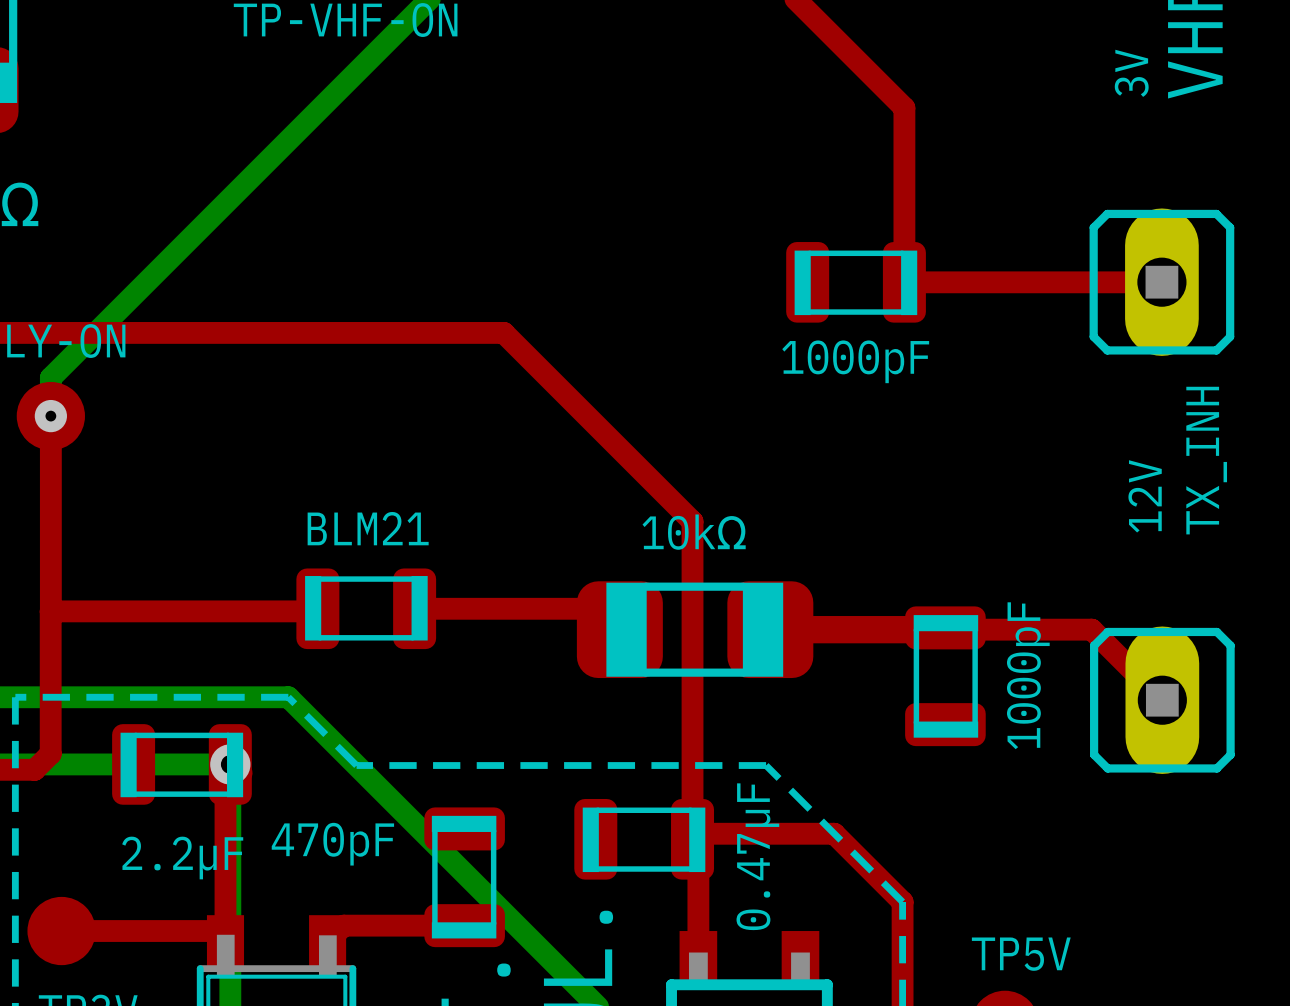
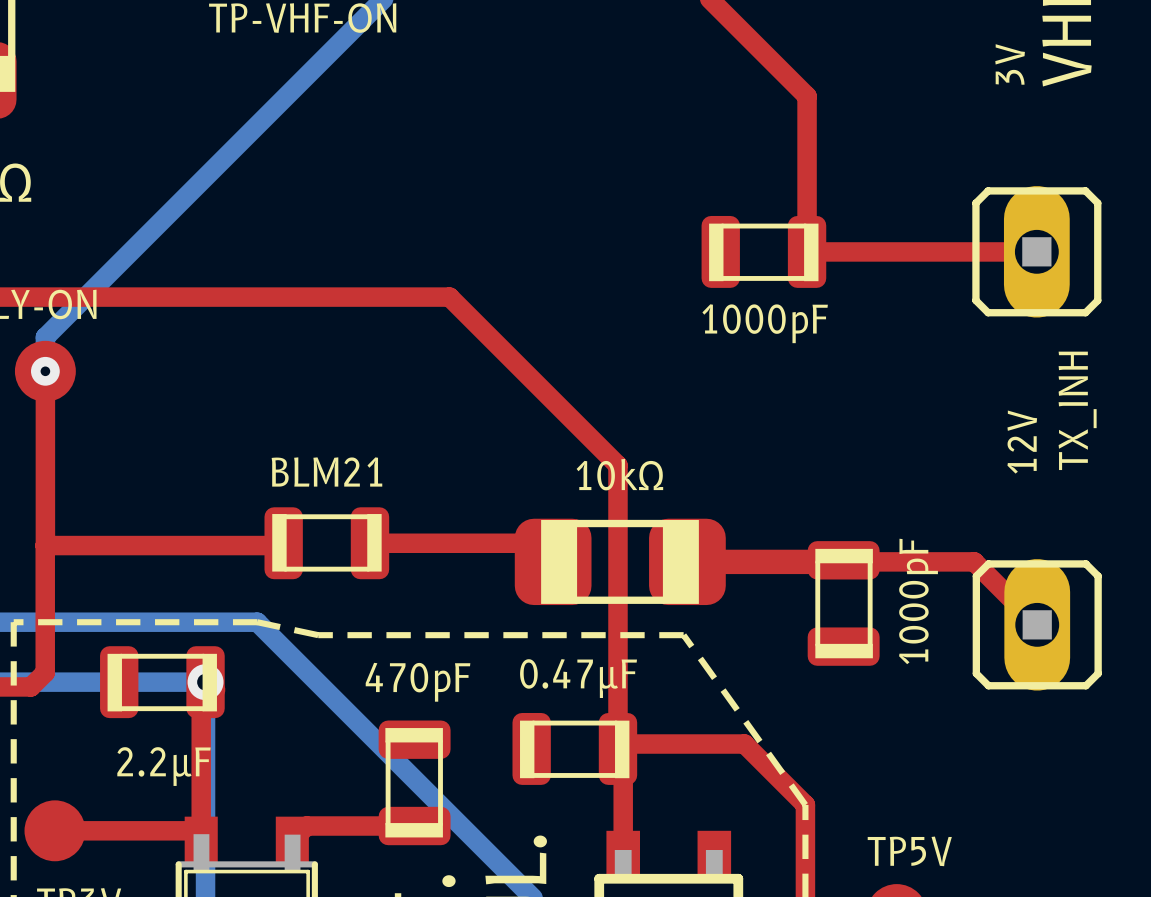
line: (288, 697) (356, 765) (766, 765) (902, 902) -> (257, 622) (318, 635) (683, 635) (805, 804)
part value position: 470pF (332, 844) -> 470pF (418, 682)
part value rotation: 0° (757, 856) -> 90° clockwise (578, 678)

